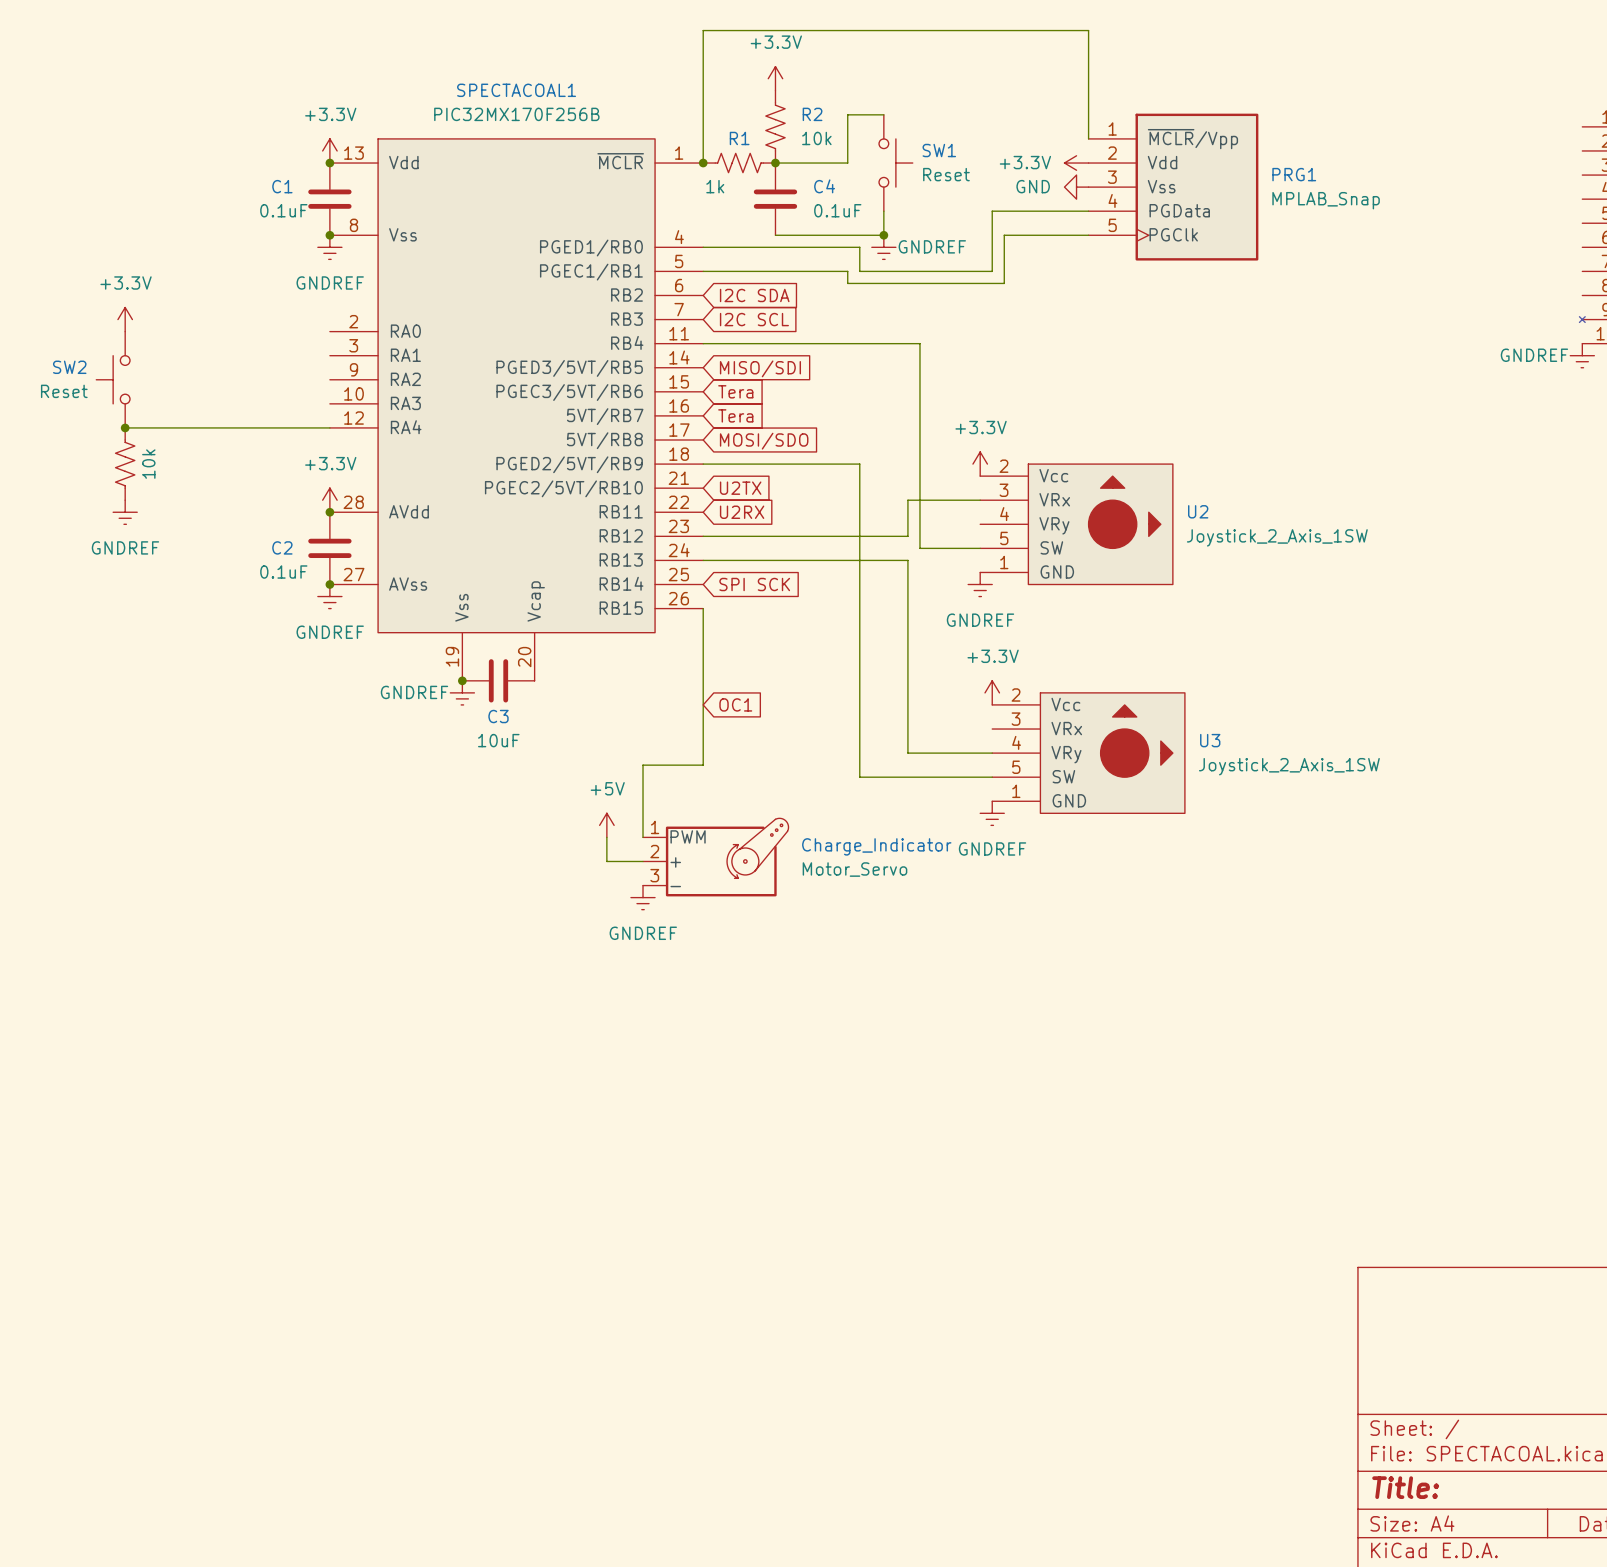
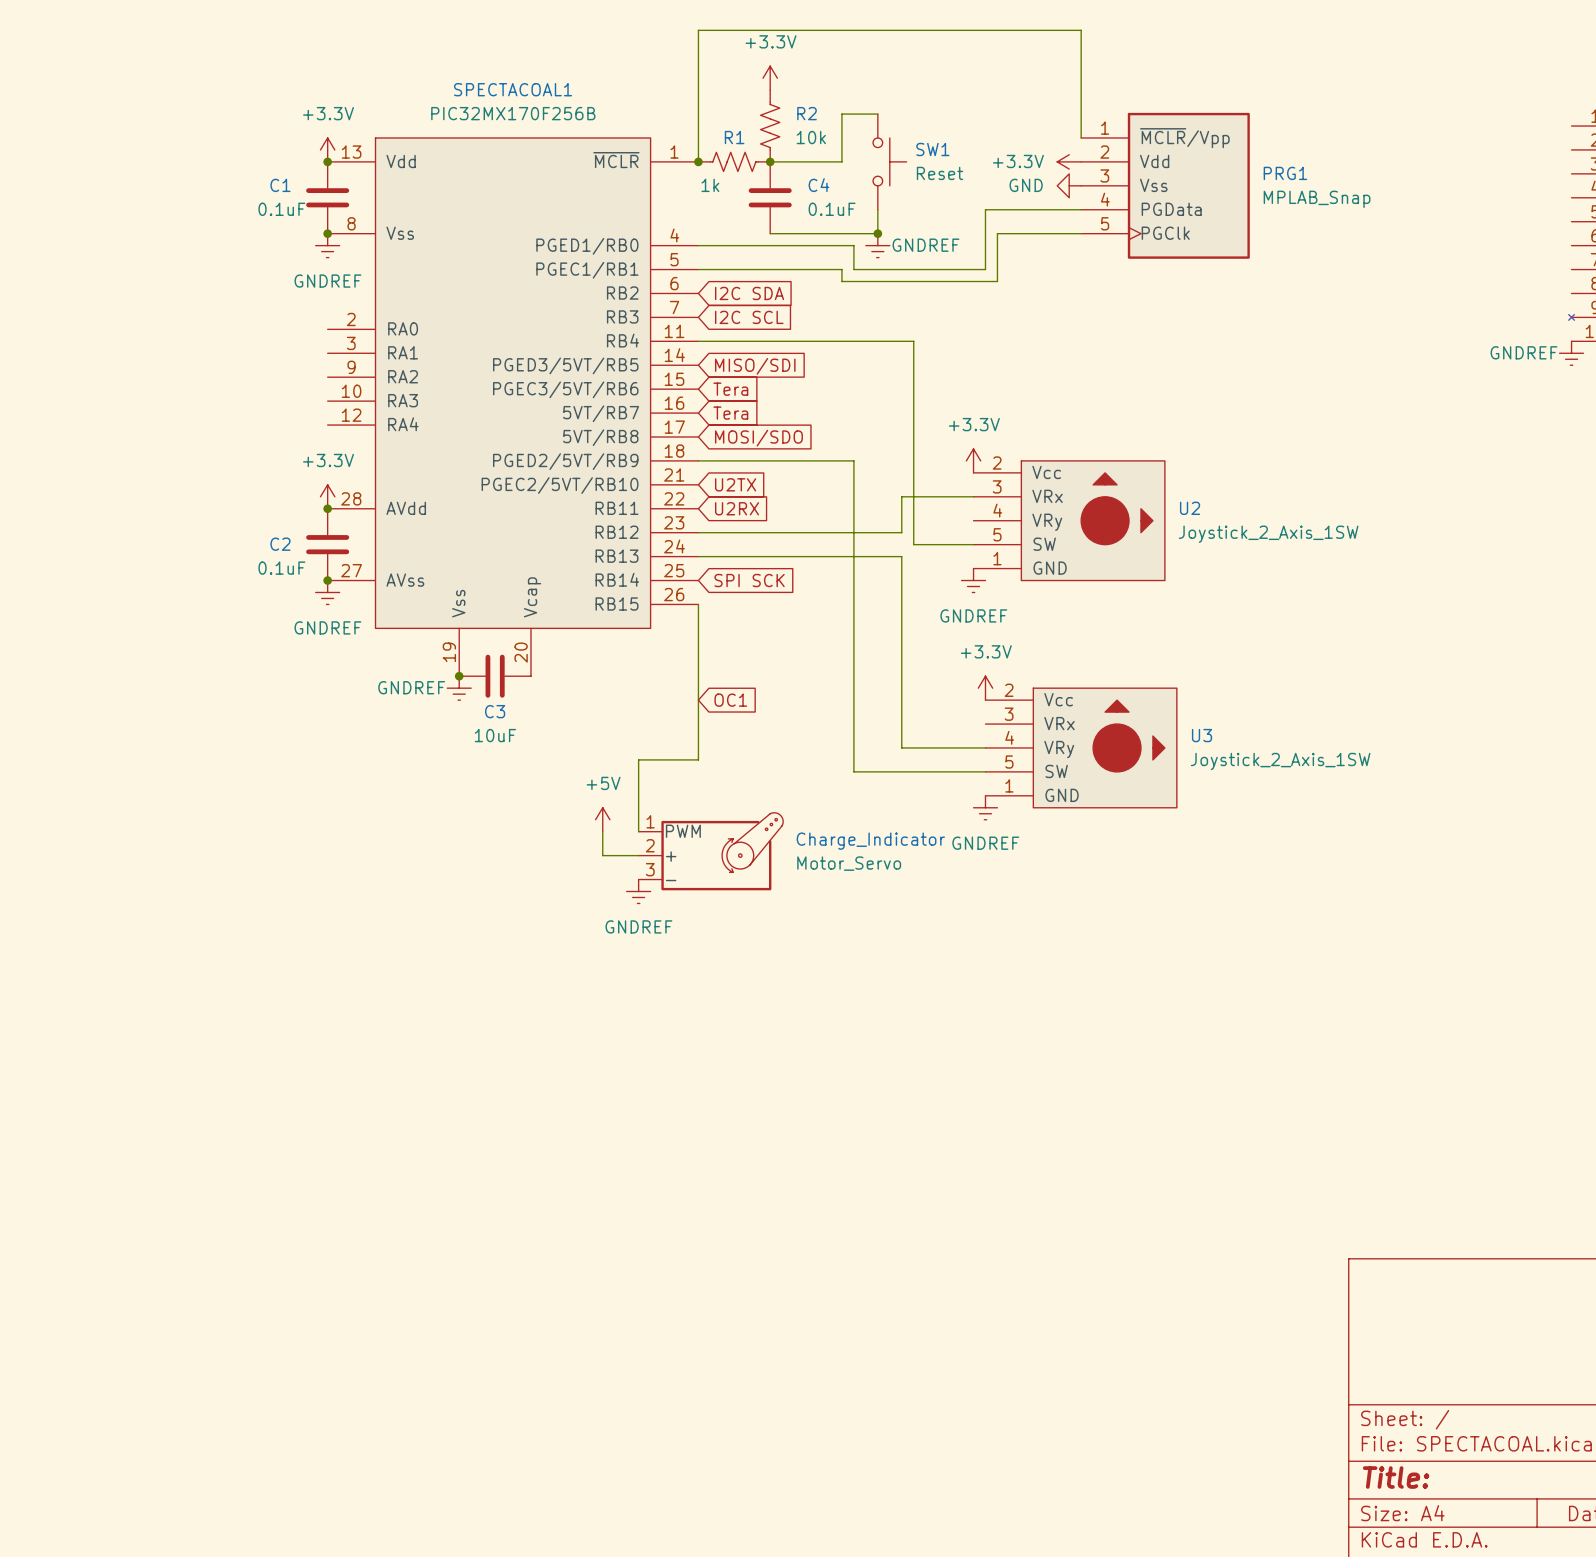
power symbol: +3.3V (125, 319) -> none
SW2: Reset (113, 379) -> none
wire: (125, 427) (329, 427) -> none
junction: (125, 427) -> none
part: 10k (125, 464) -> none
power symbol: GNDREF (125, 512) -> none

